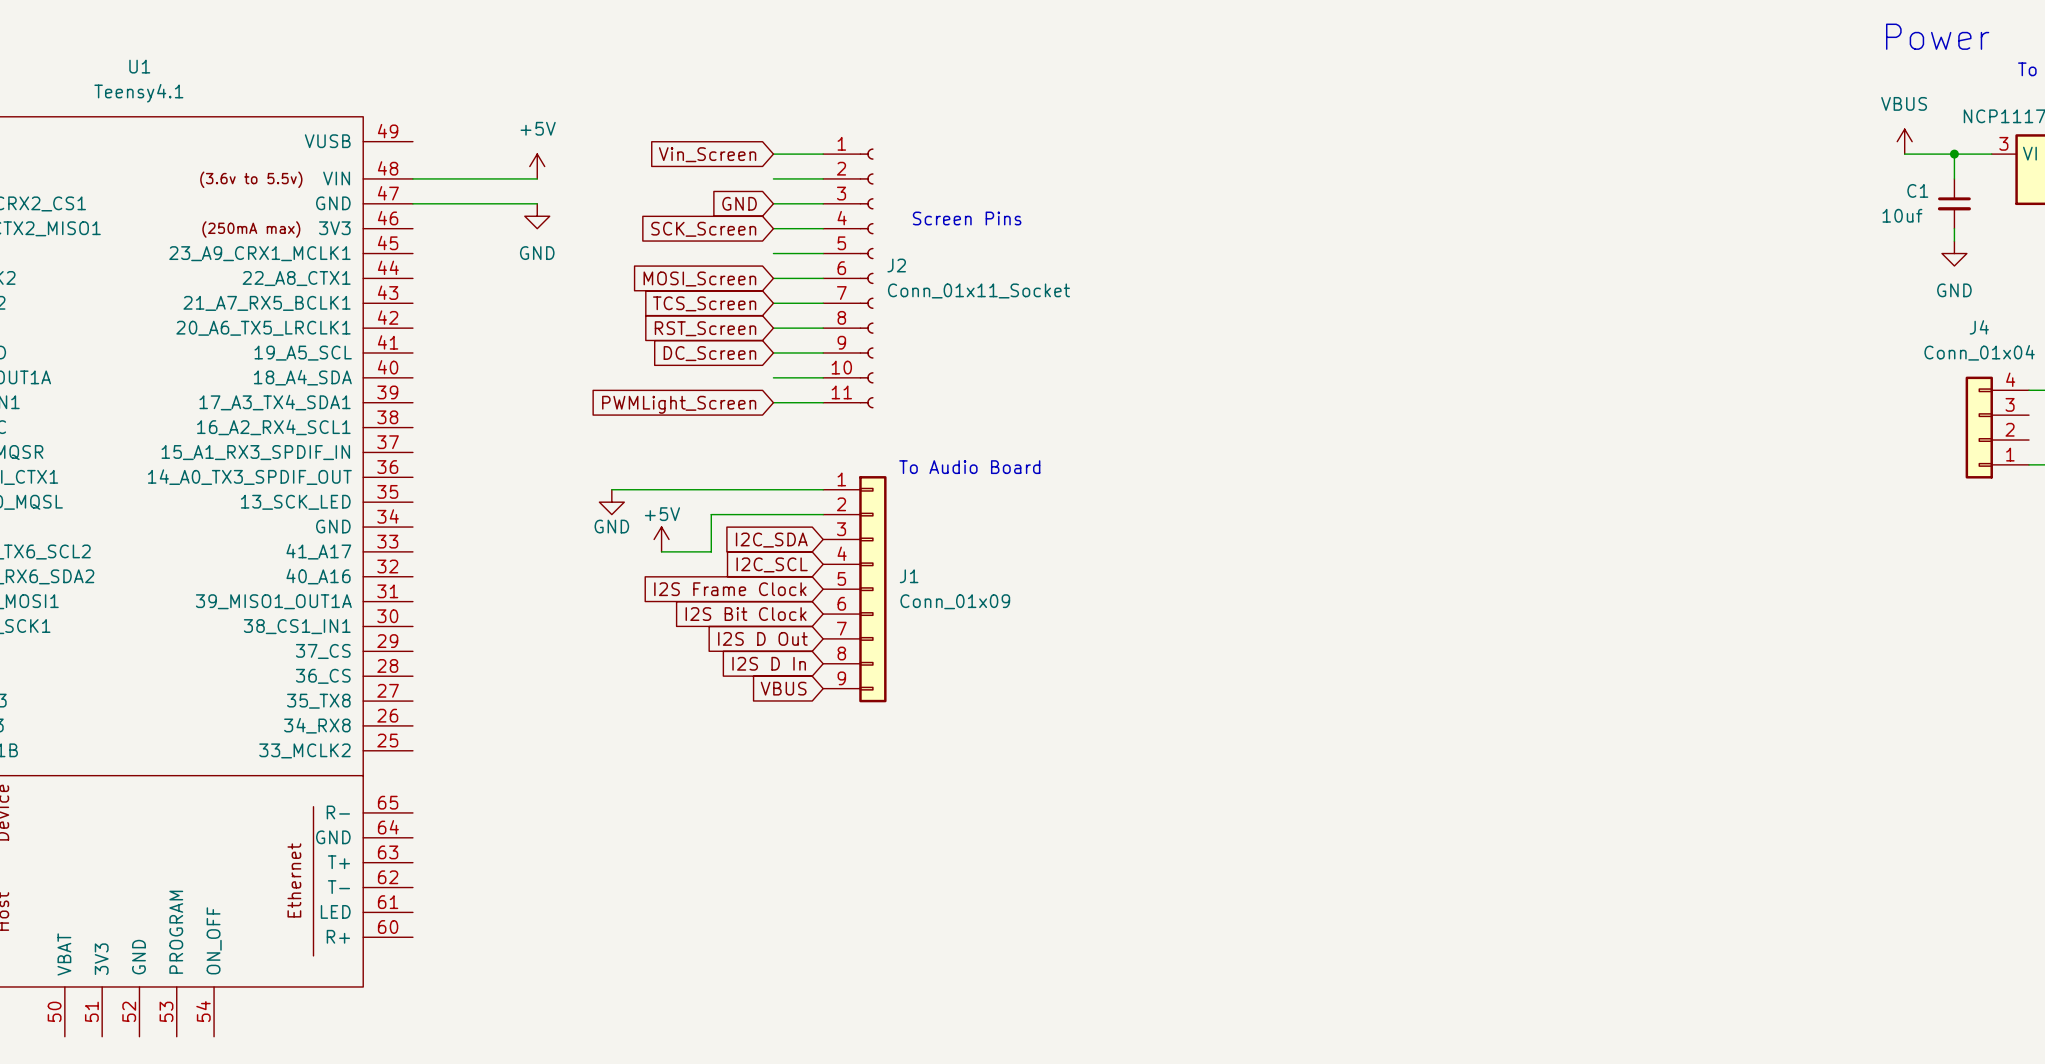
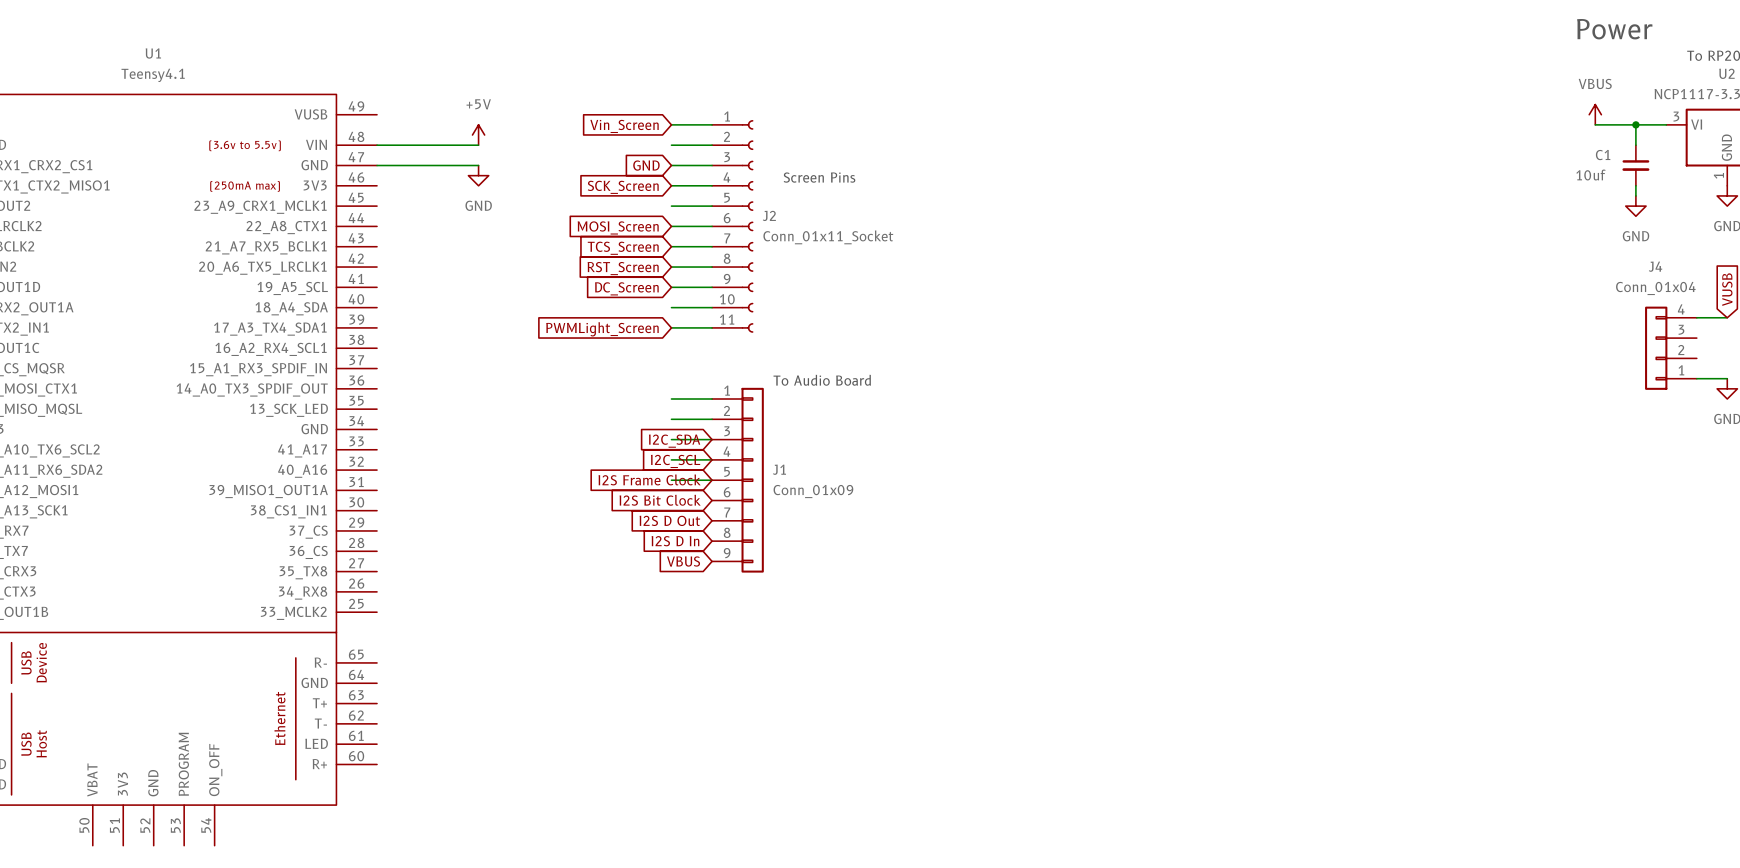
wire: (611, 489) (773, 489) -> none
power symbol: GND (611, 502) -> none
wire: (773, 514) (711, 514) (711, 551) (661, 551) -> none
power symbol: +5V (661, 539) -> none
wire: none -> (671, 439) (712, 439)
wire: none -> (671, 459) (712, 459)
wire: none -> (671, 480) (712, 480)

